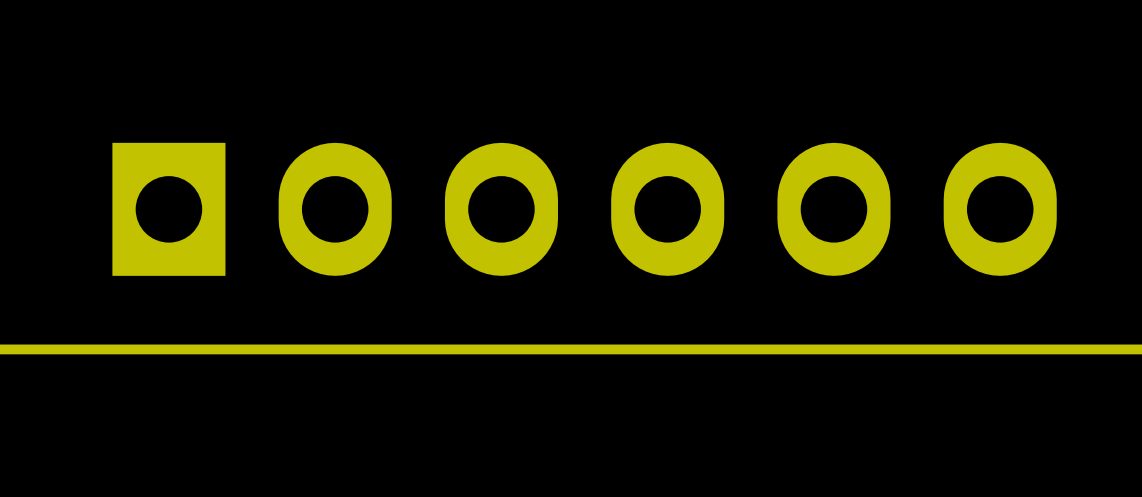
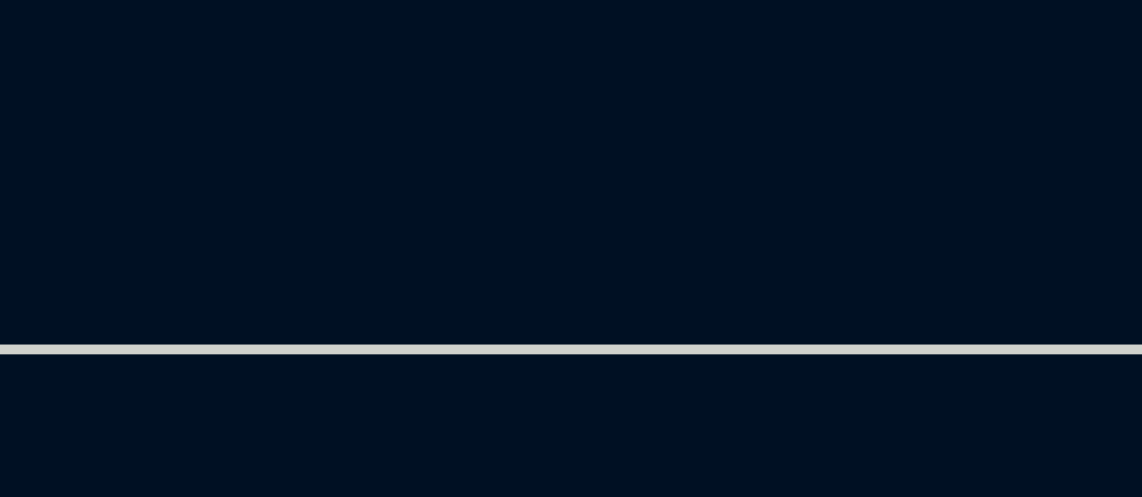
part: (584, 209) -> none

